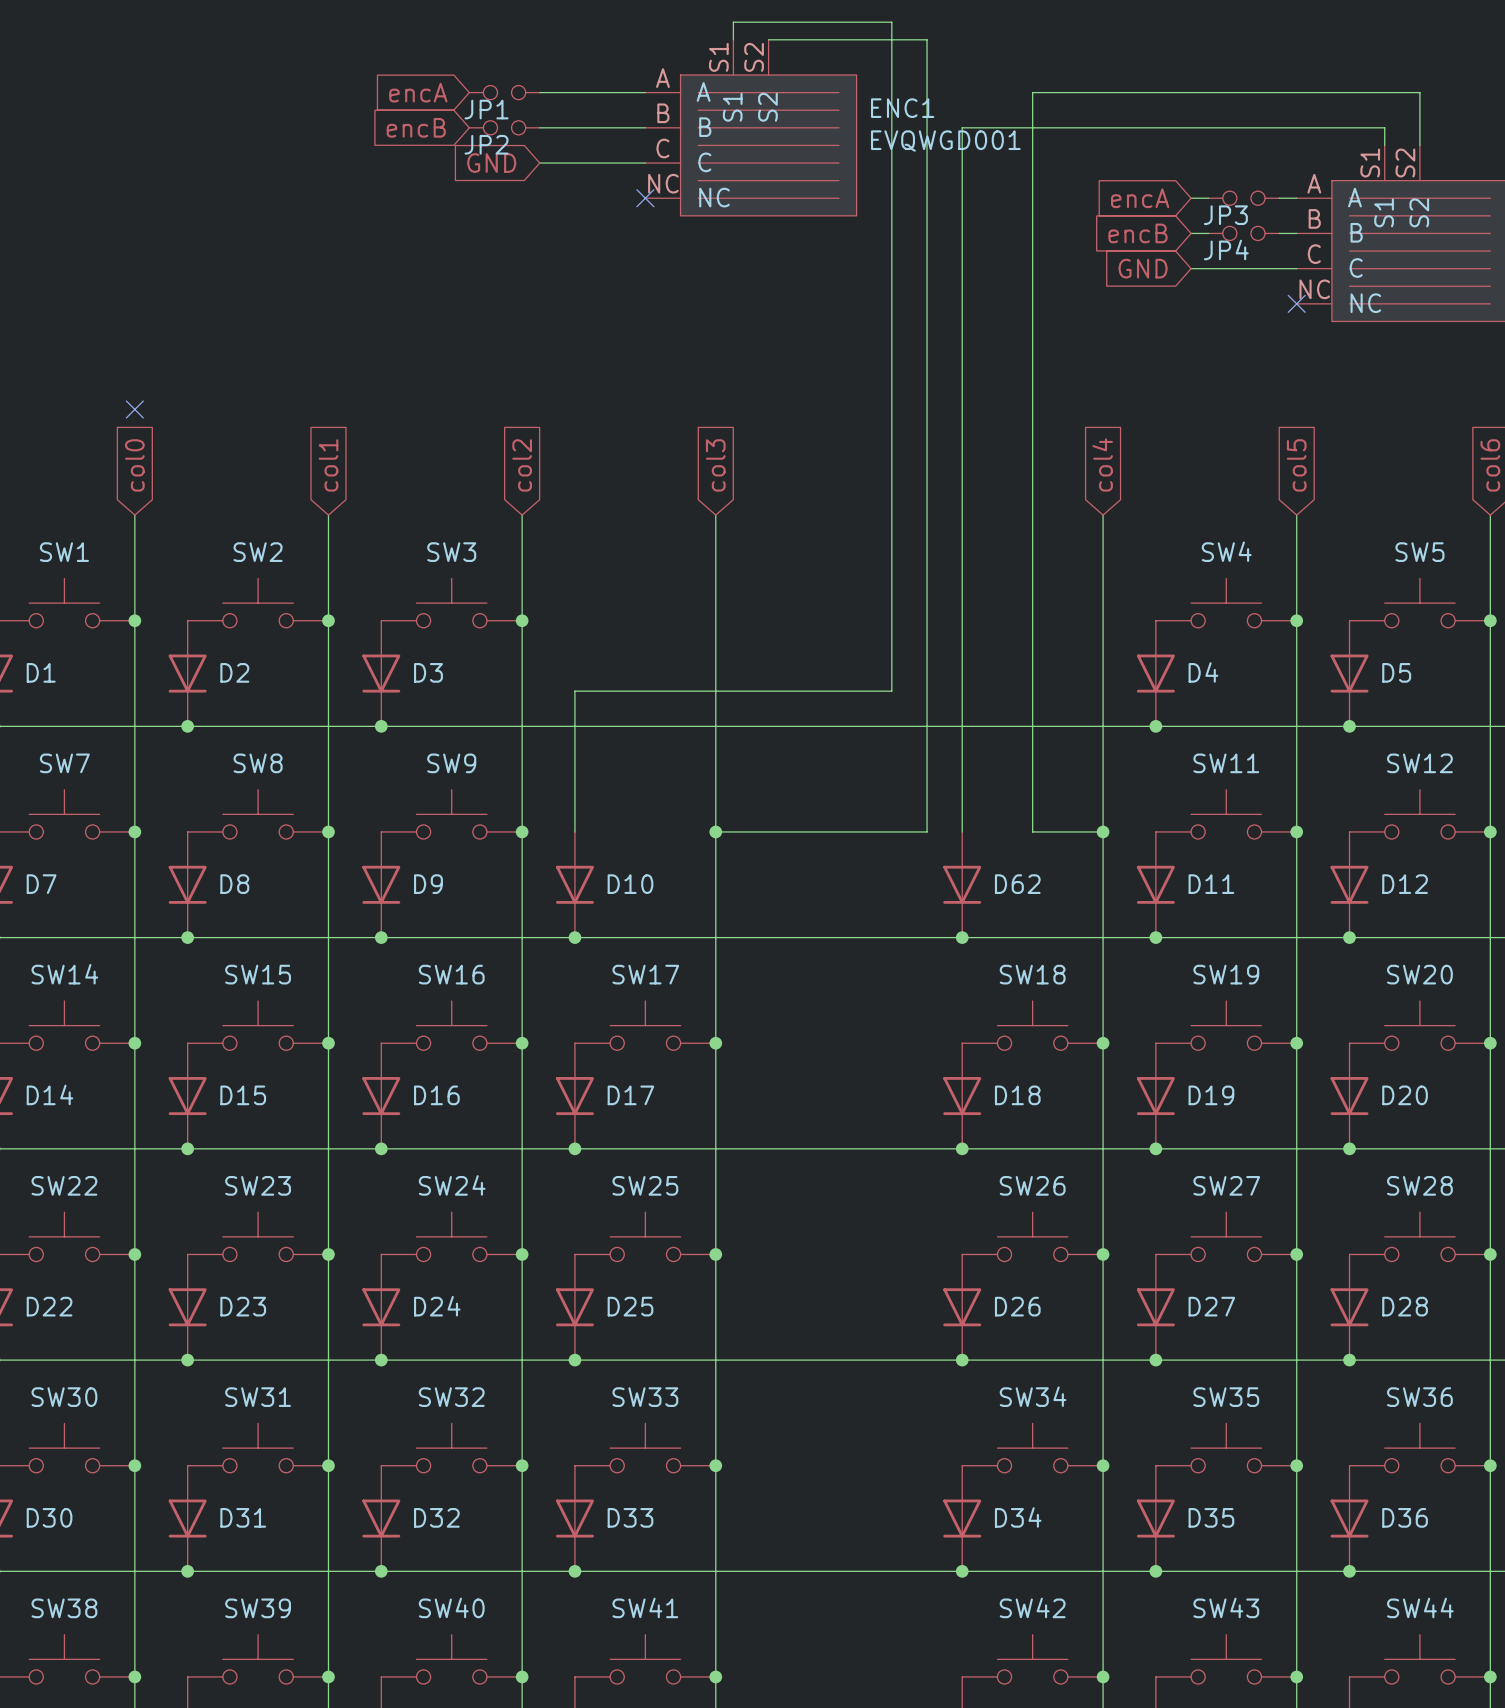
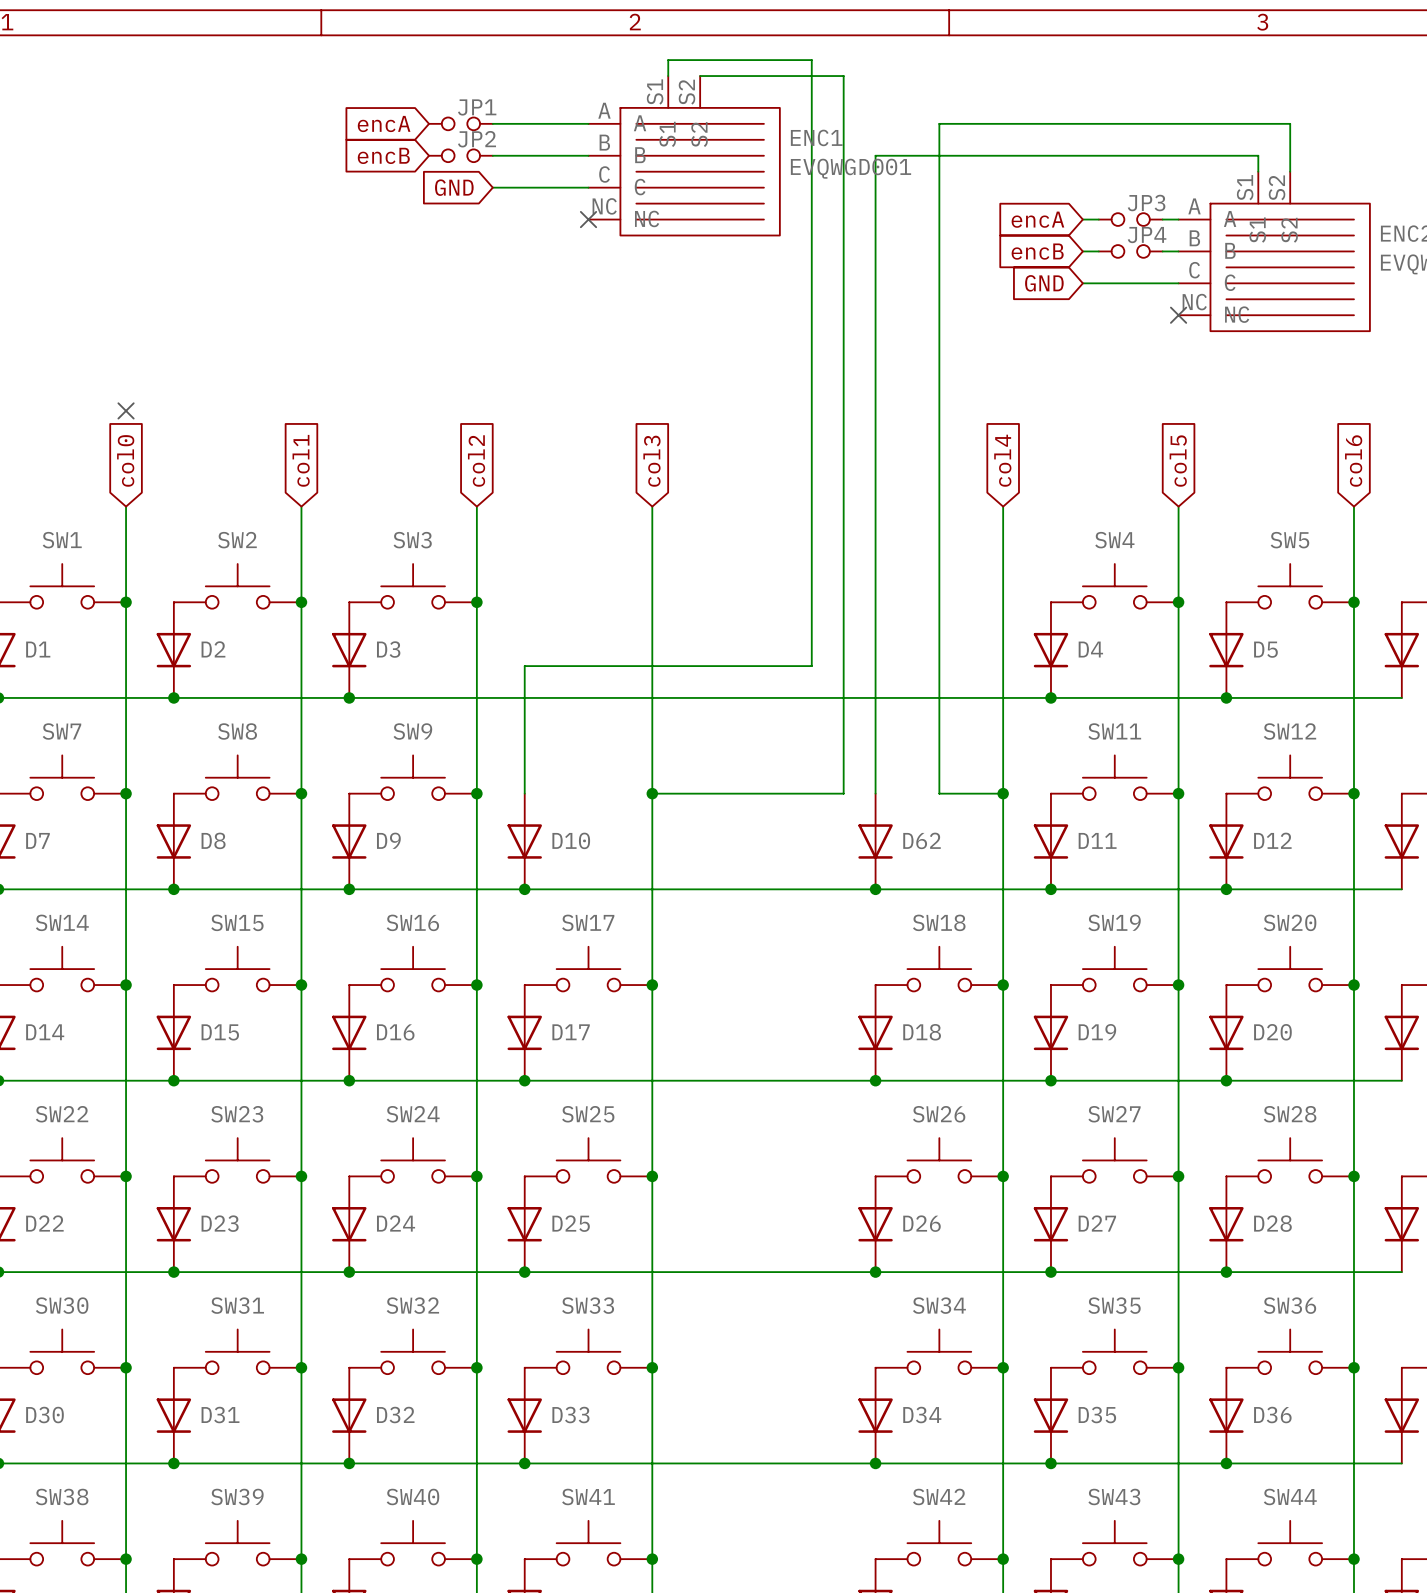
JP1 name position: JP1 (486, 109) -> JP1 (477, 107)
JP2 name position: JP2 (486, 144) -> JP2 (477, 139)
JP3 name position: JP3 (1225, 215) -> JP3 (1146, 203)
JP4 name position: JP4 (1226, 249) -> JP4 (1147, 235)

